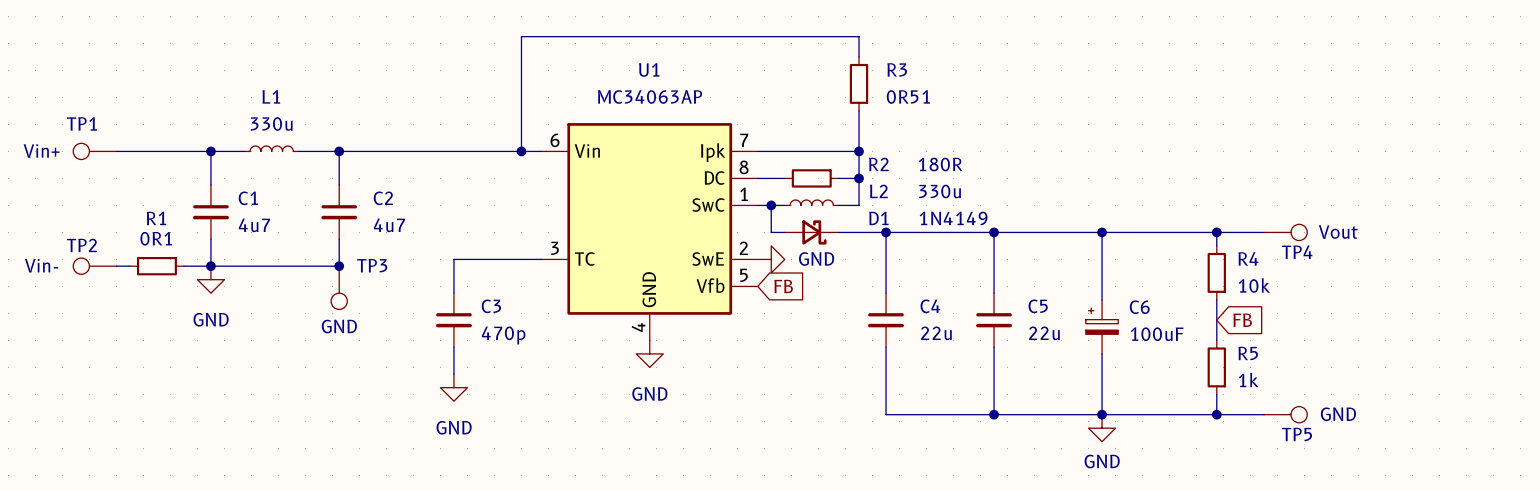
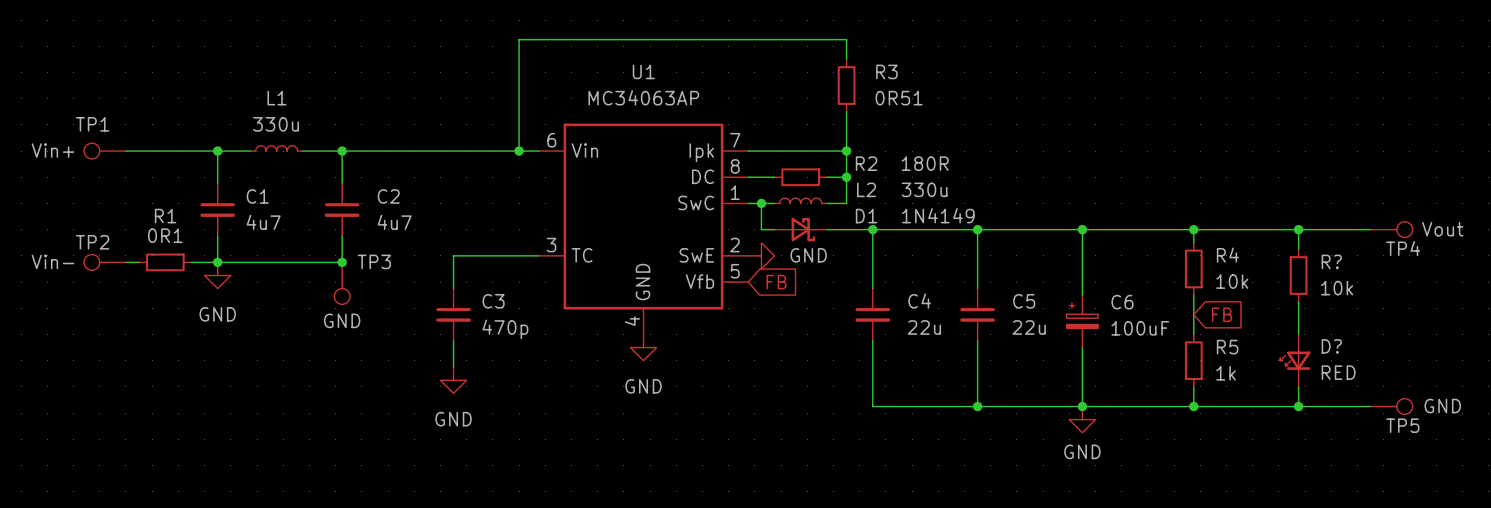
wire: none -> (1239, 229) (1370, 229)
TP4 position: (1285, 232) -> (1391, 229)
wire: none -> (1298, 229) (1298, 249)
junction: none -> (1298, 229)
R?: none -> 10k (1298, 275)
wire: none -> (1298, 301) (1298, 334)
D?: none -> RED (1295, 360)
wire: none -> (1298, 386) (1298, 406)
wire: none -> (1239, 406) (1370, 406)
TP5 position: (1285, 414) -> (1391, 406)
junction: none -> (1298, 406)

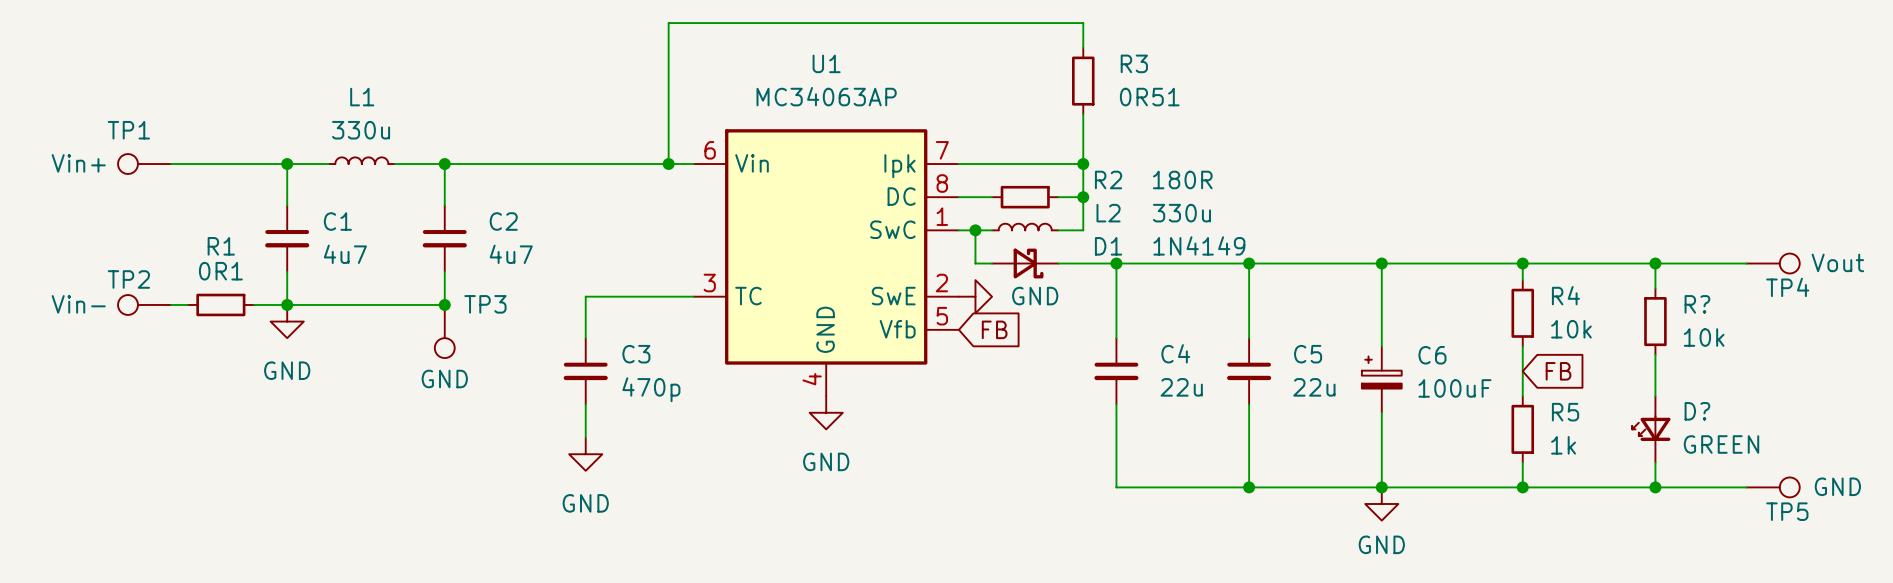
D? value: RED (1338, 372) -> GREEN (1721, 444)

